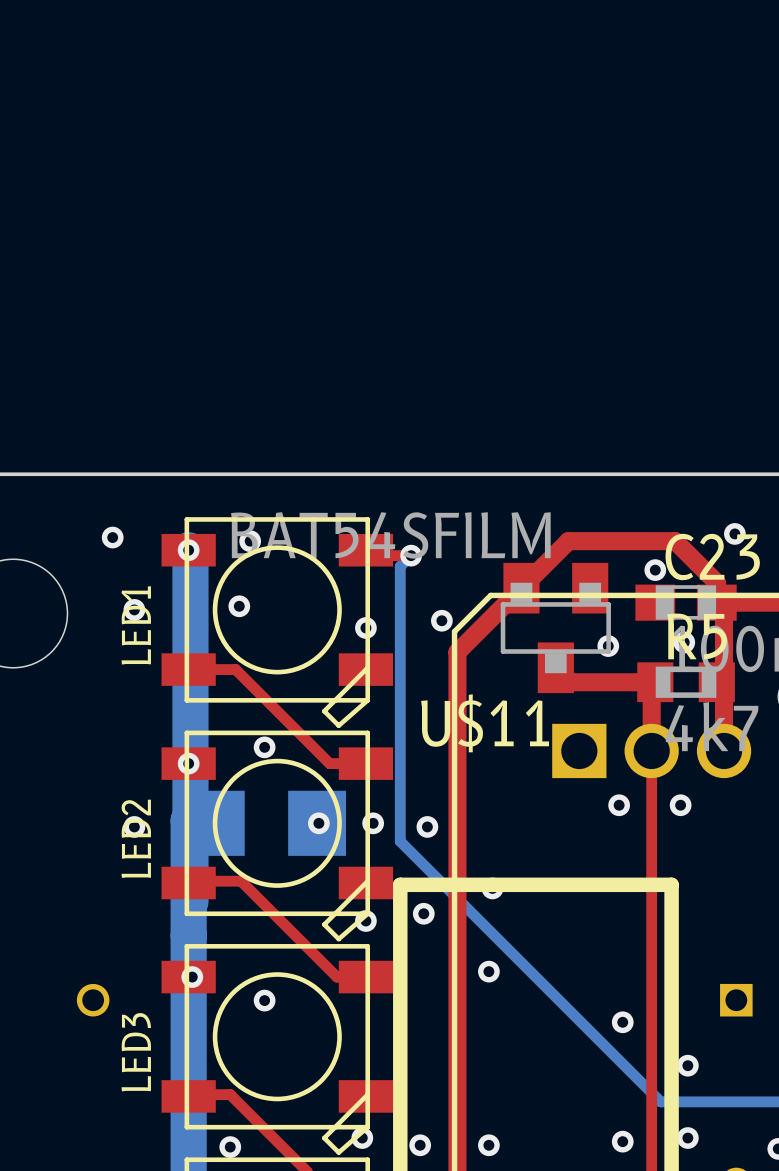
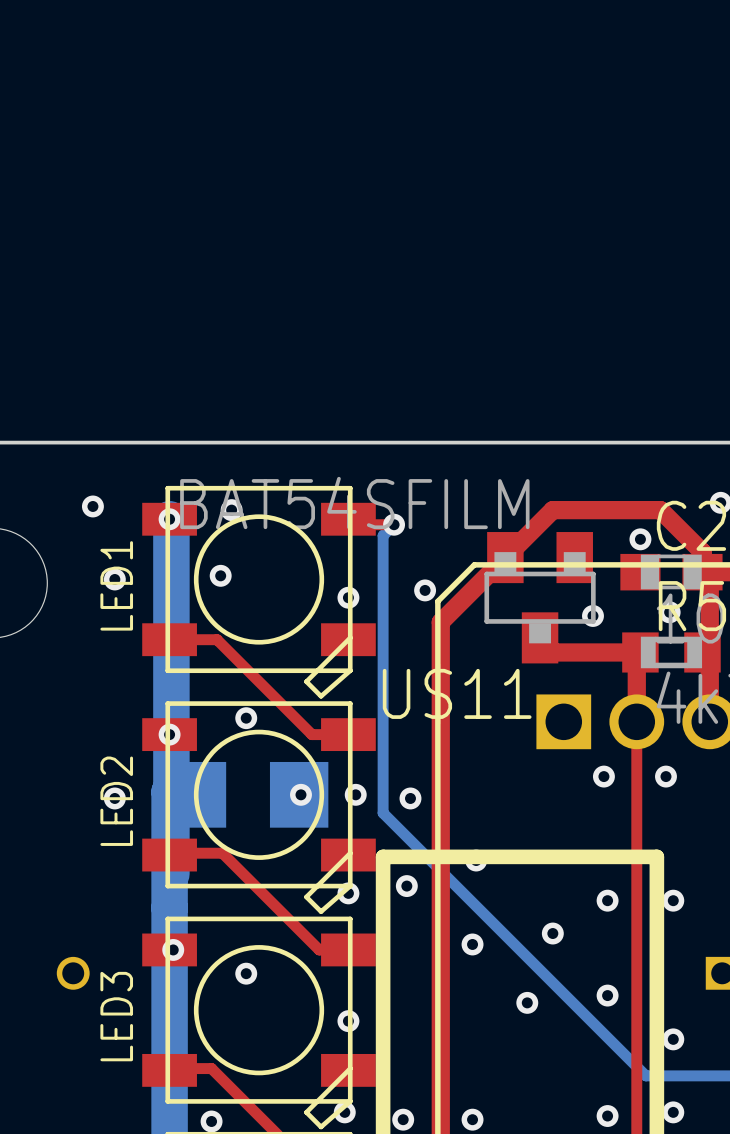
via: none -> (607, 900)
via: none -> (673, 900)
via: none -> (552, 933)
via: none -> (527, 1002)
via: none -> (348, 1021)

